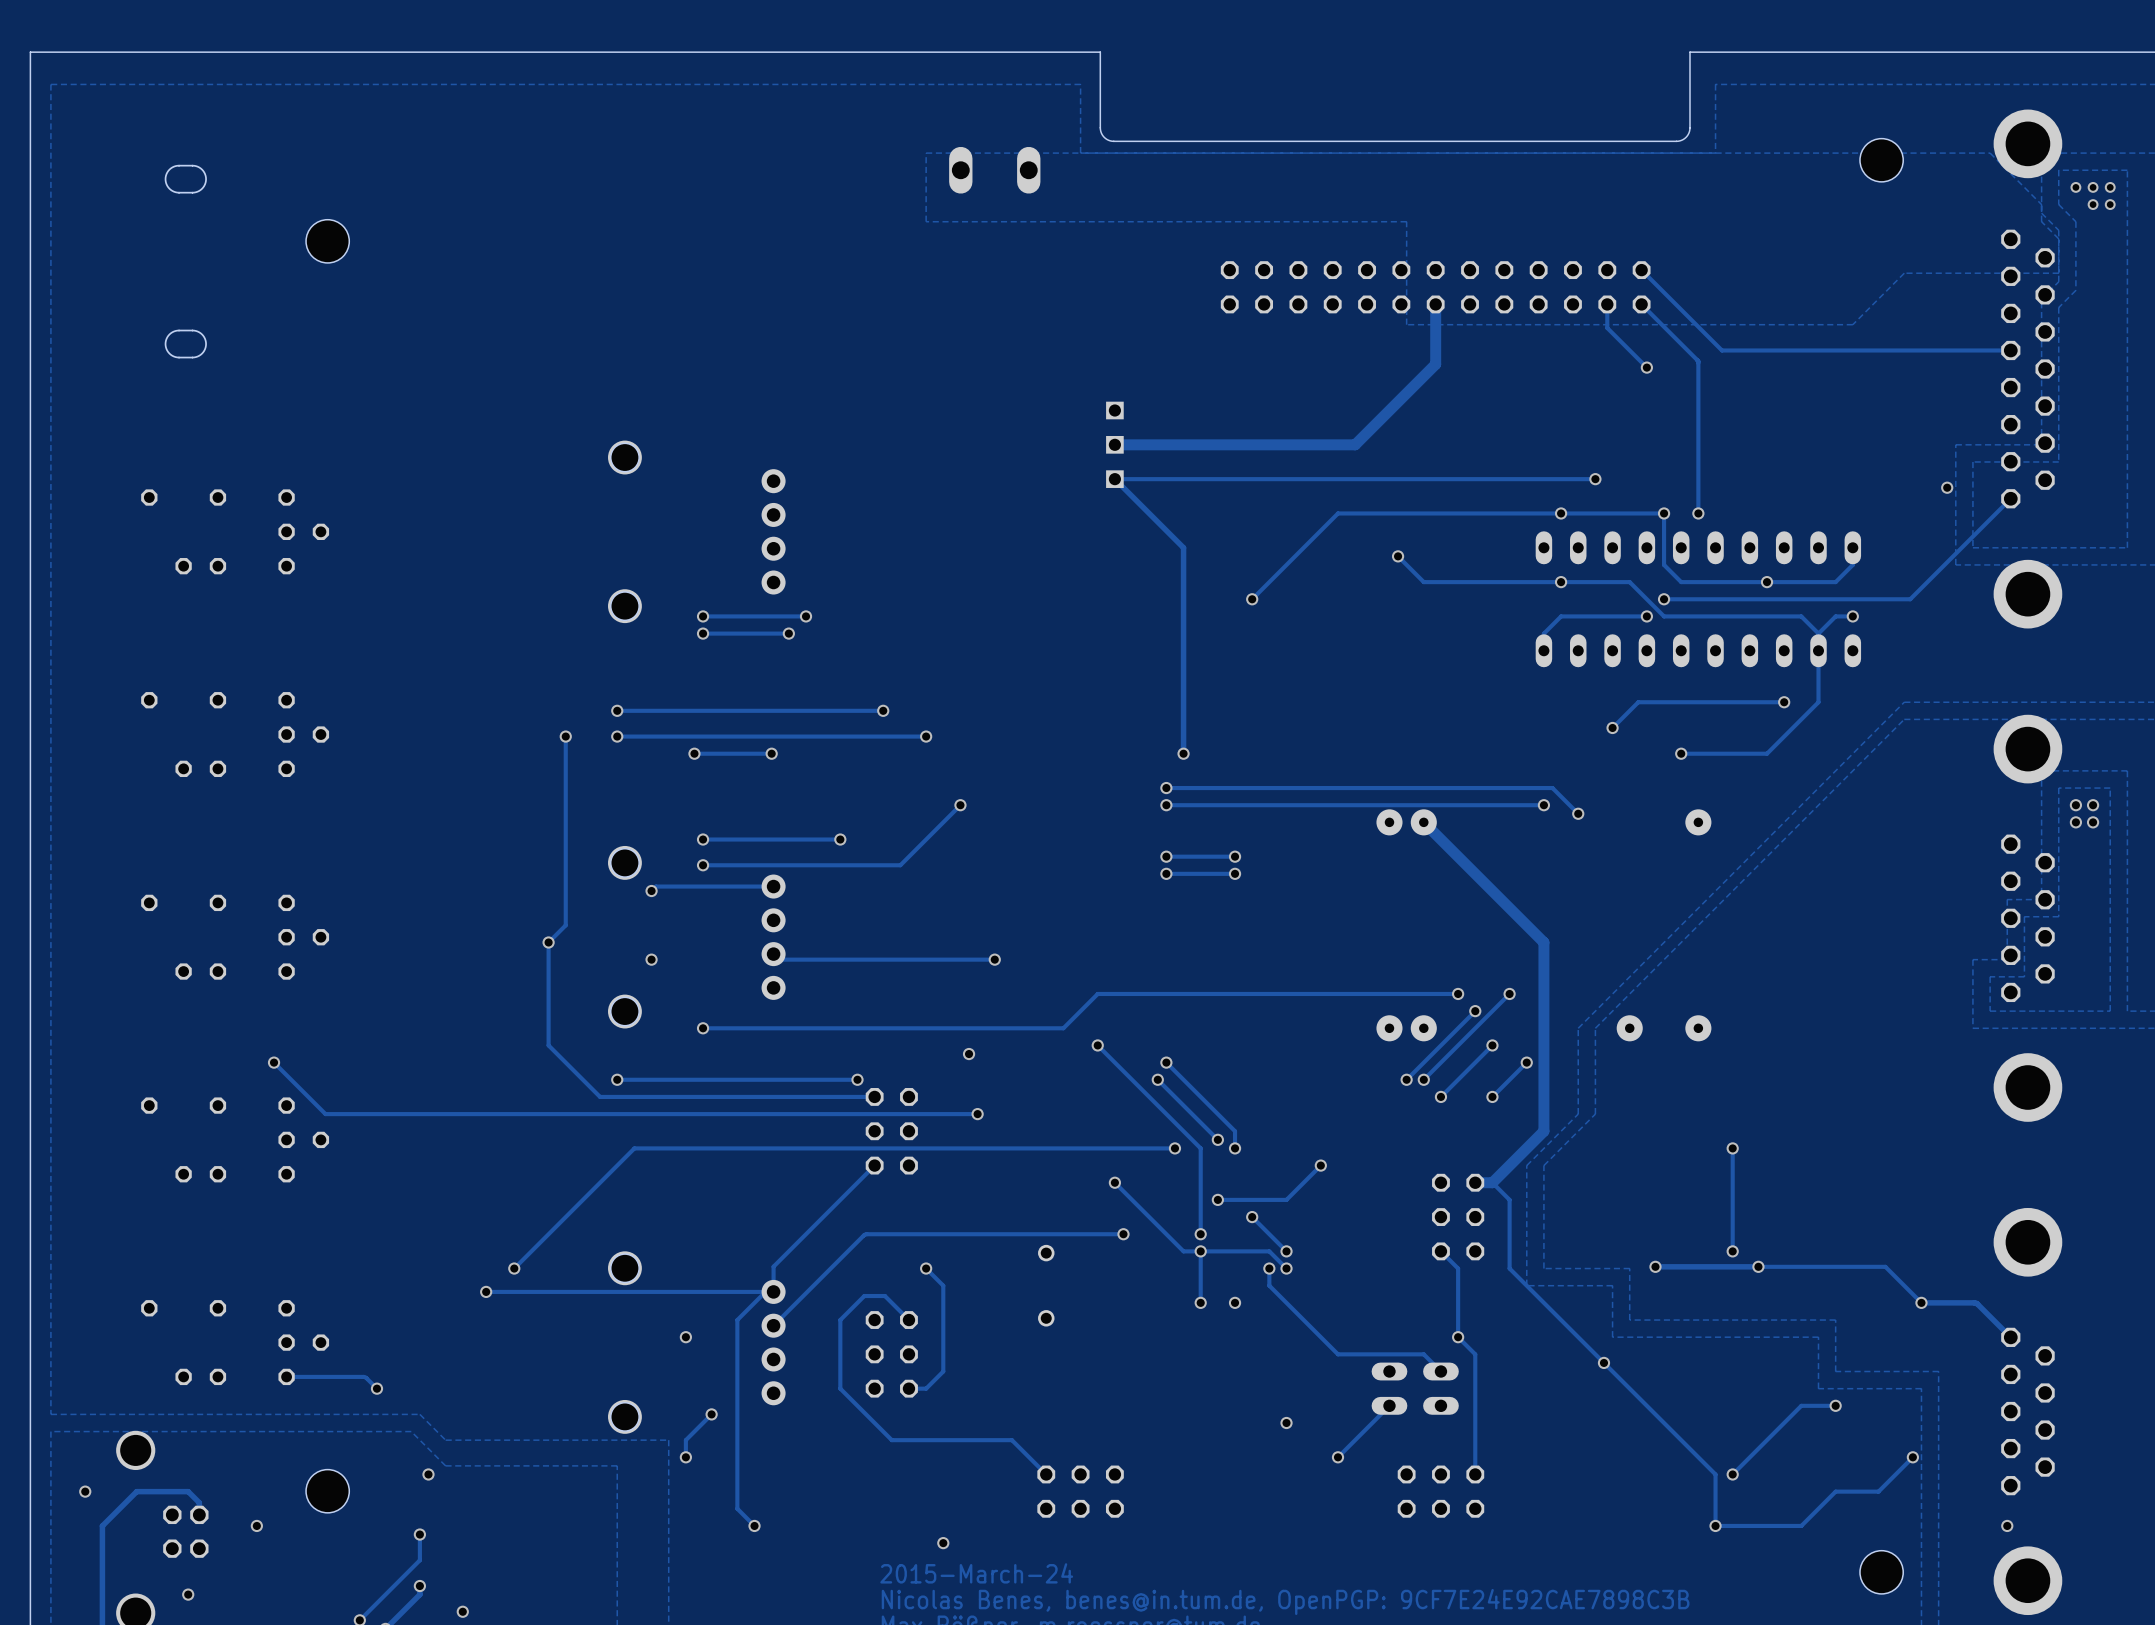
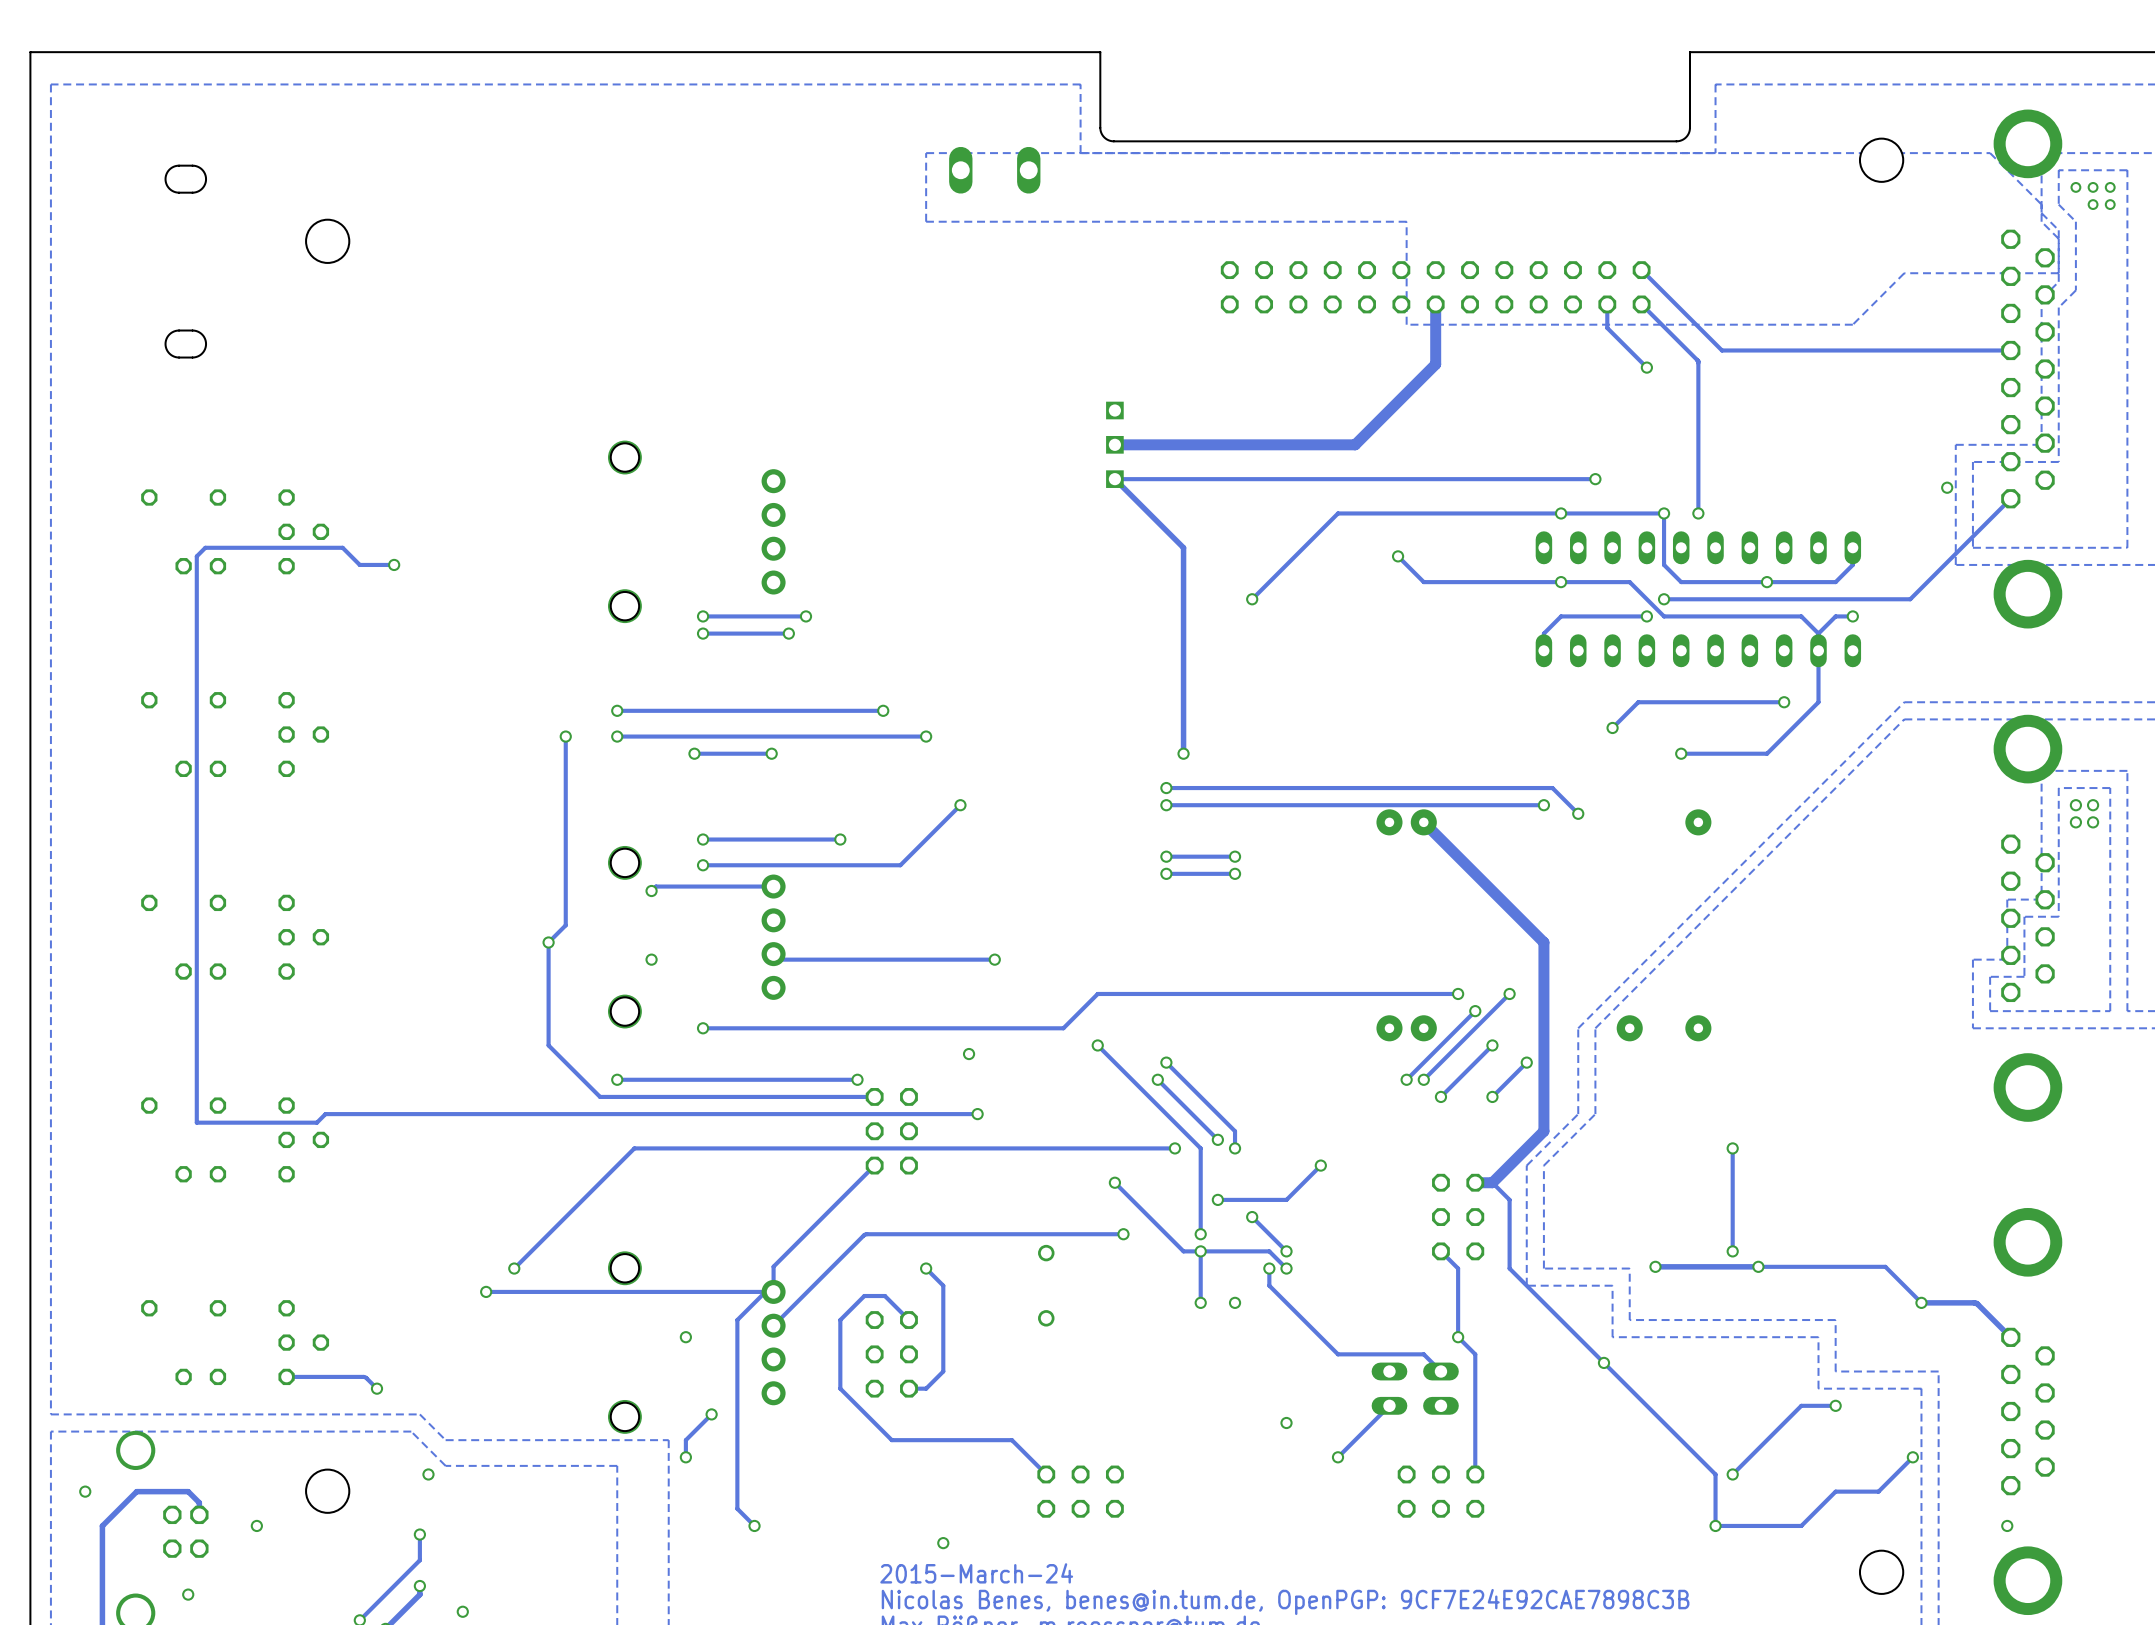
via: none -> (394, 564)
track: (274, 1062) (325, 1114) -> (394, 564) (359, 564) (342, 547) (205, 547) (196, 556) (196, 1122) (316, 1122) (325, 1114)
via: (274, 1062) -> none

